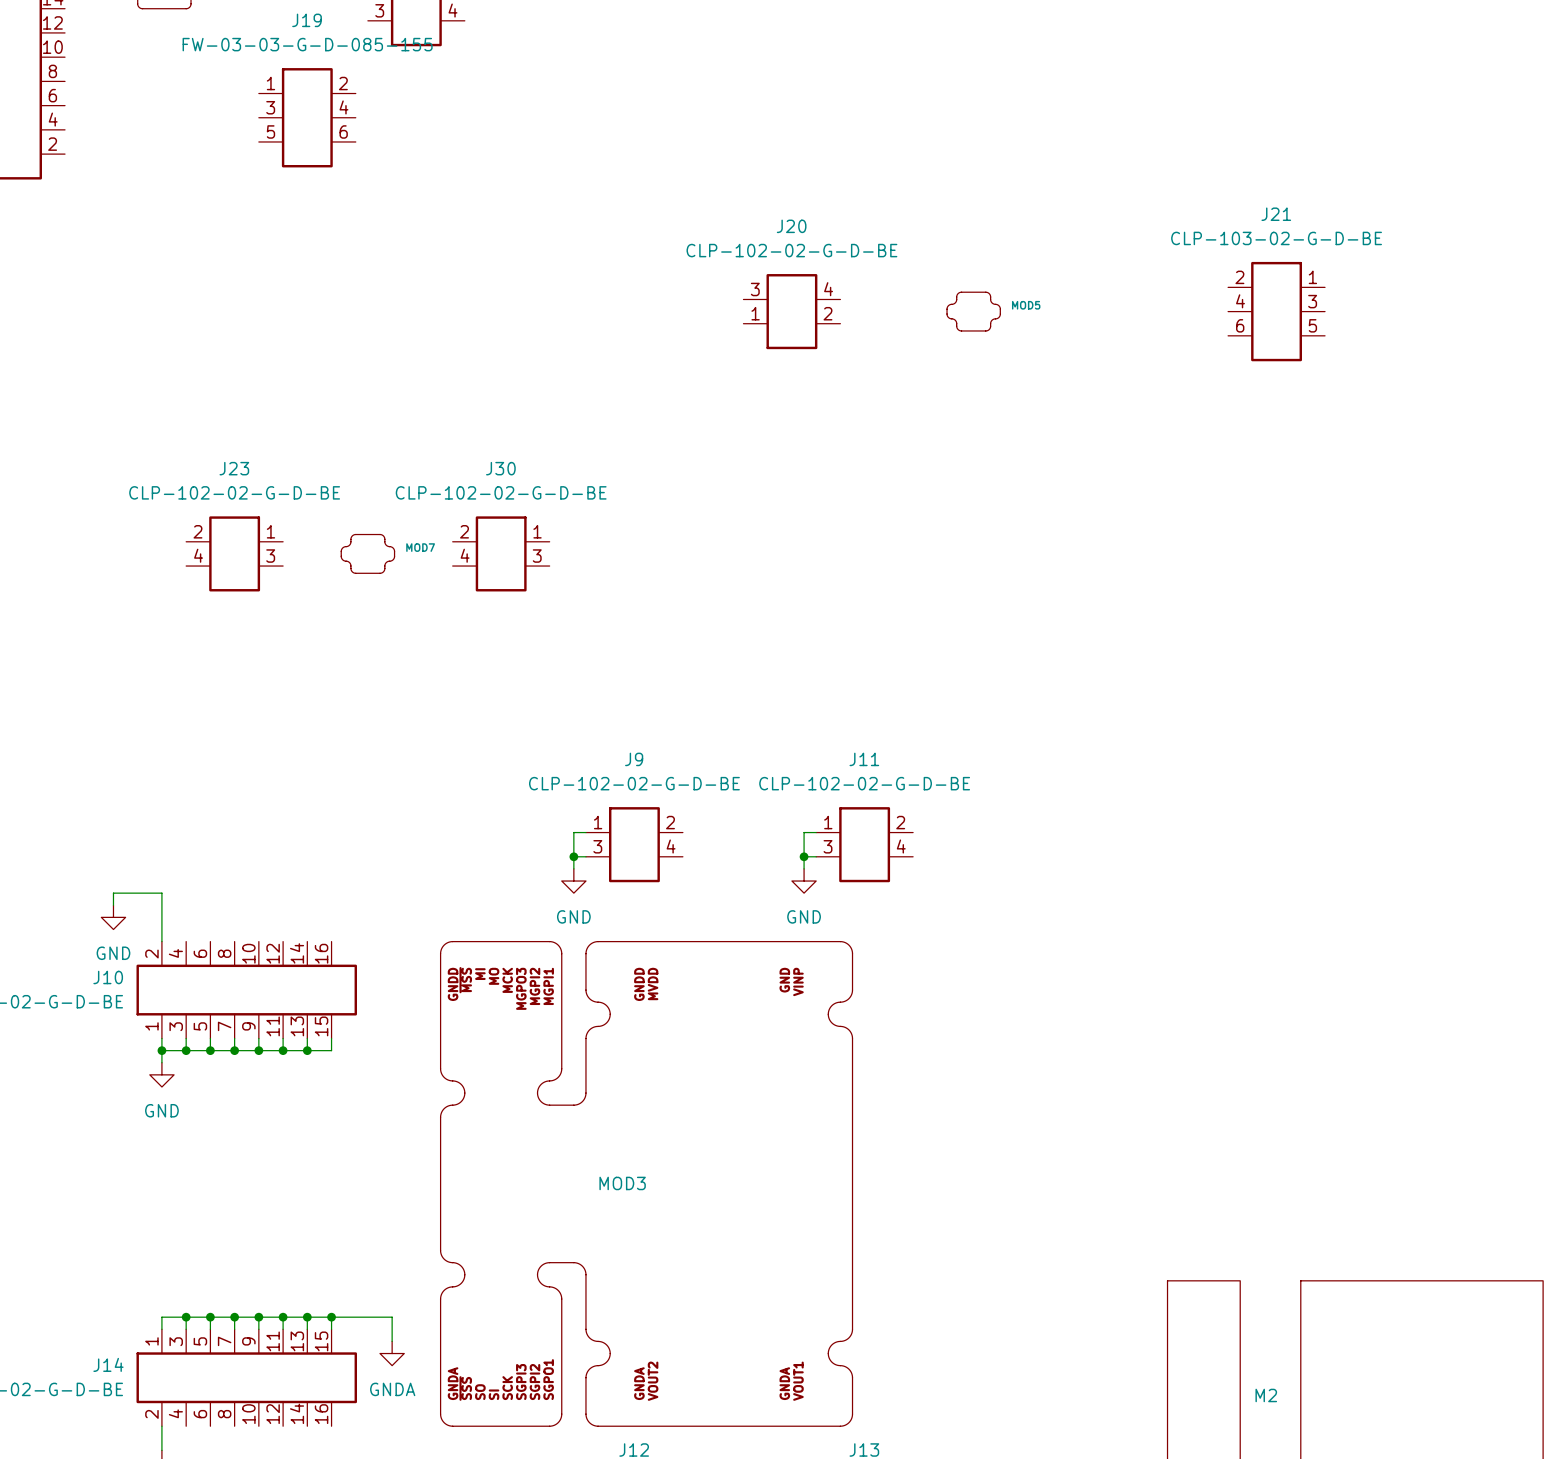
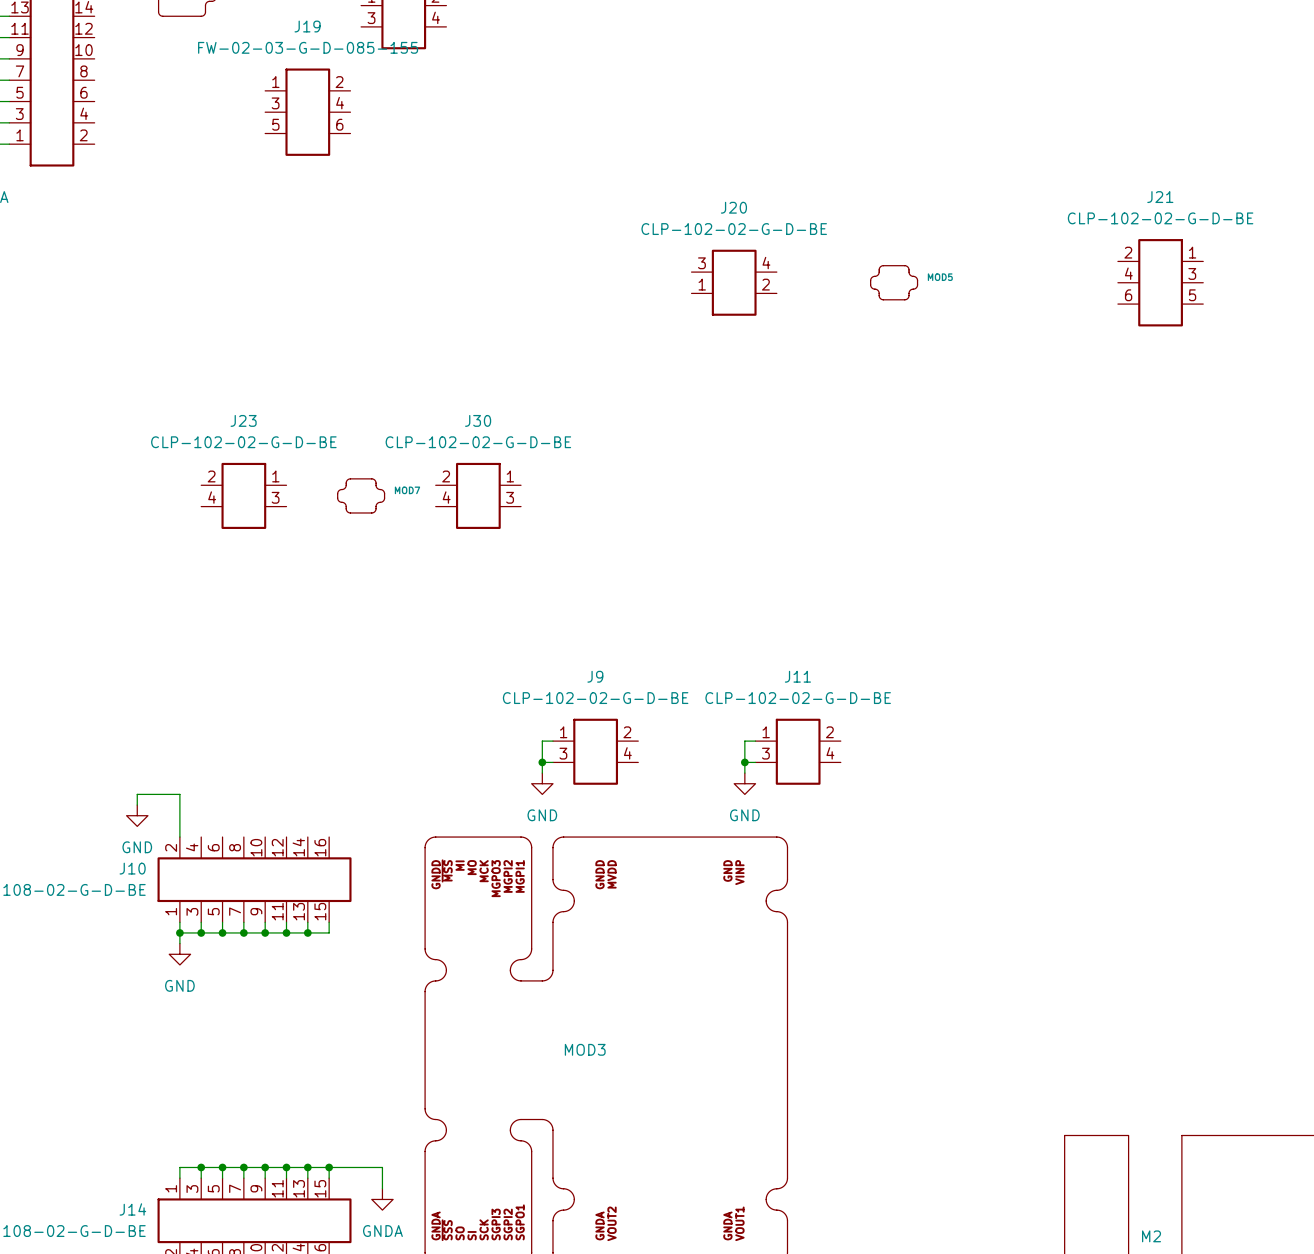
J19 value: FW-03-03-G-D-085-155 (307, 44) -> FW-02-03-G-D-085-155 (308, 47)
J21 value: CLP-103-02-G-D-BE (1276, 238) -> CLP-102-02-G-D-BE (1160, 218)

